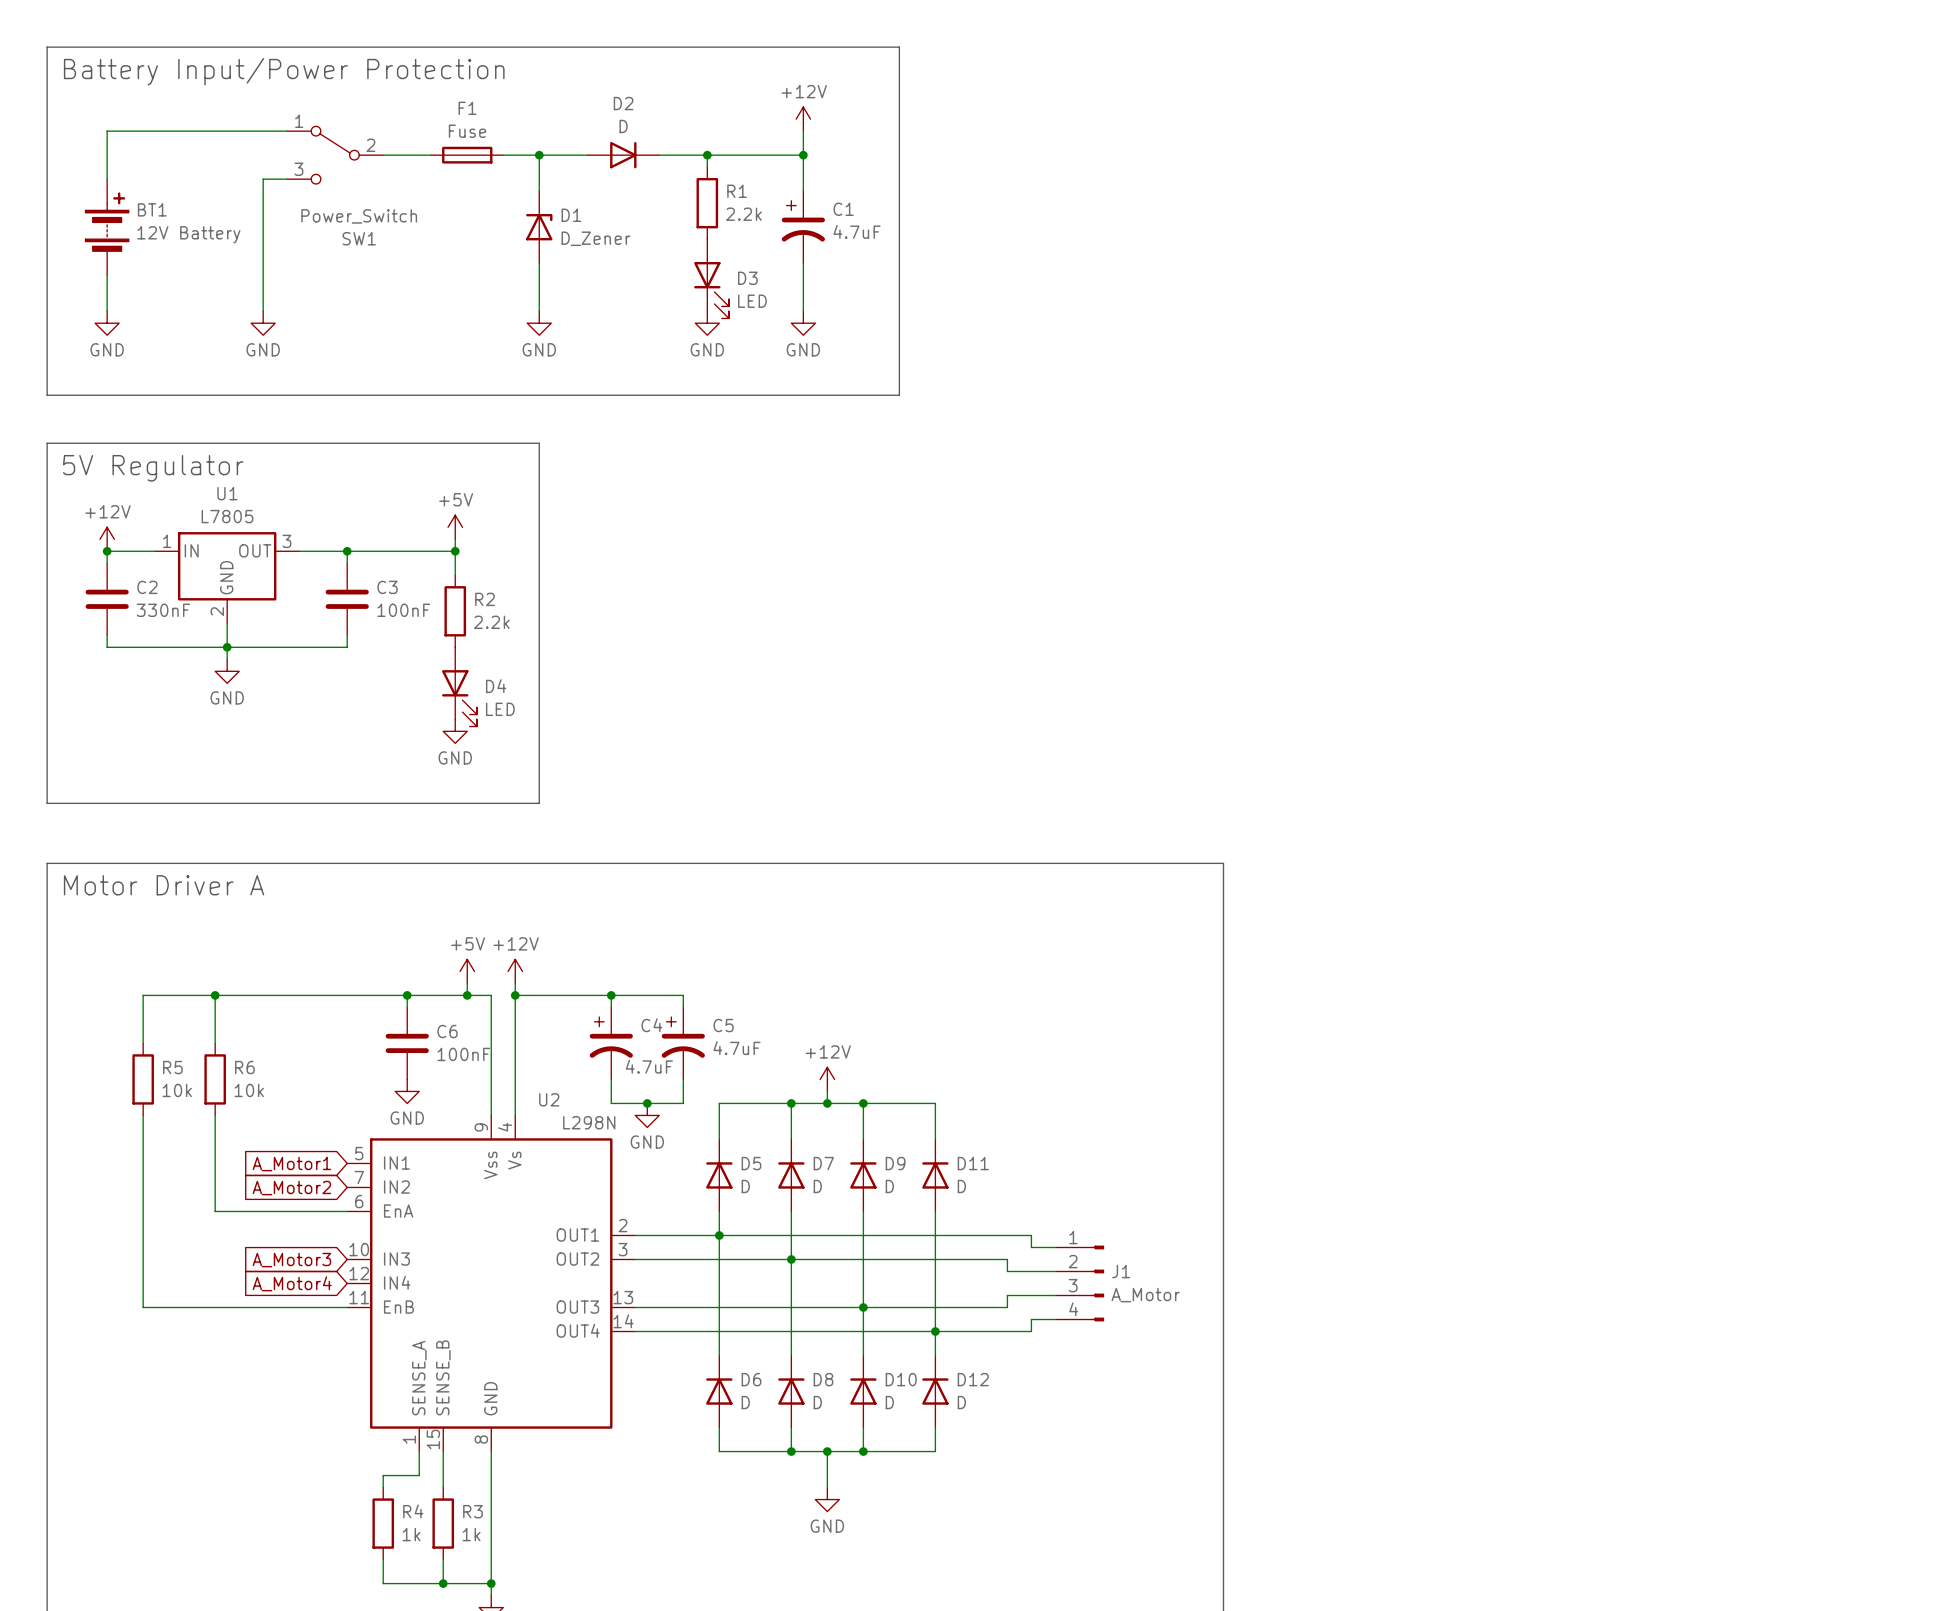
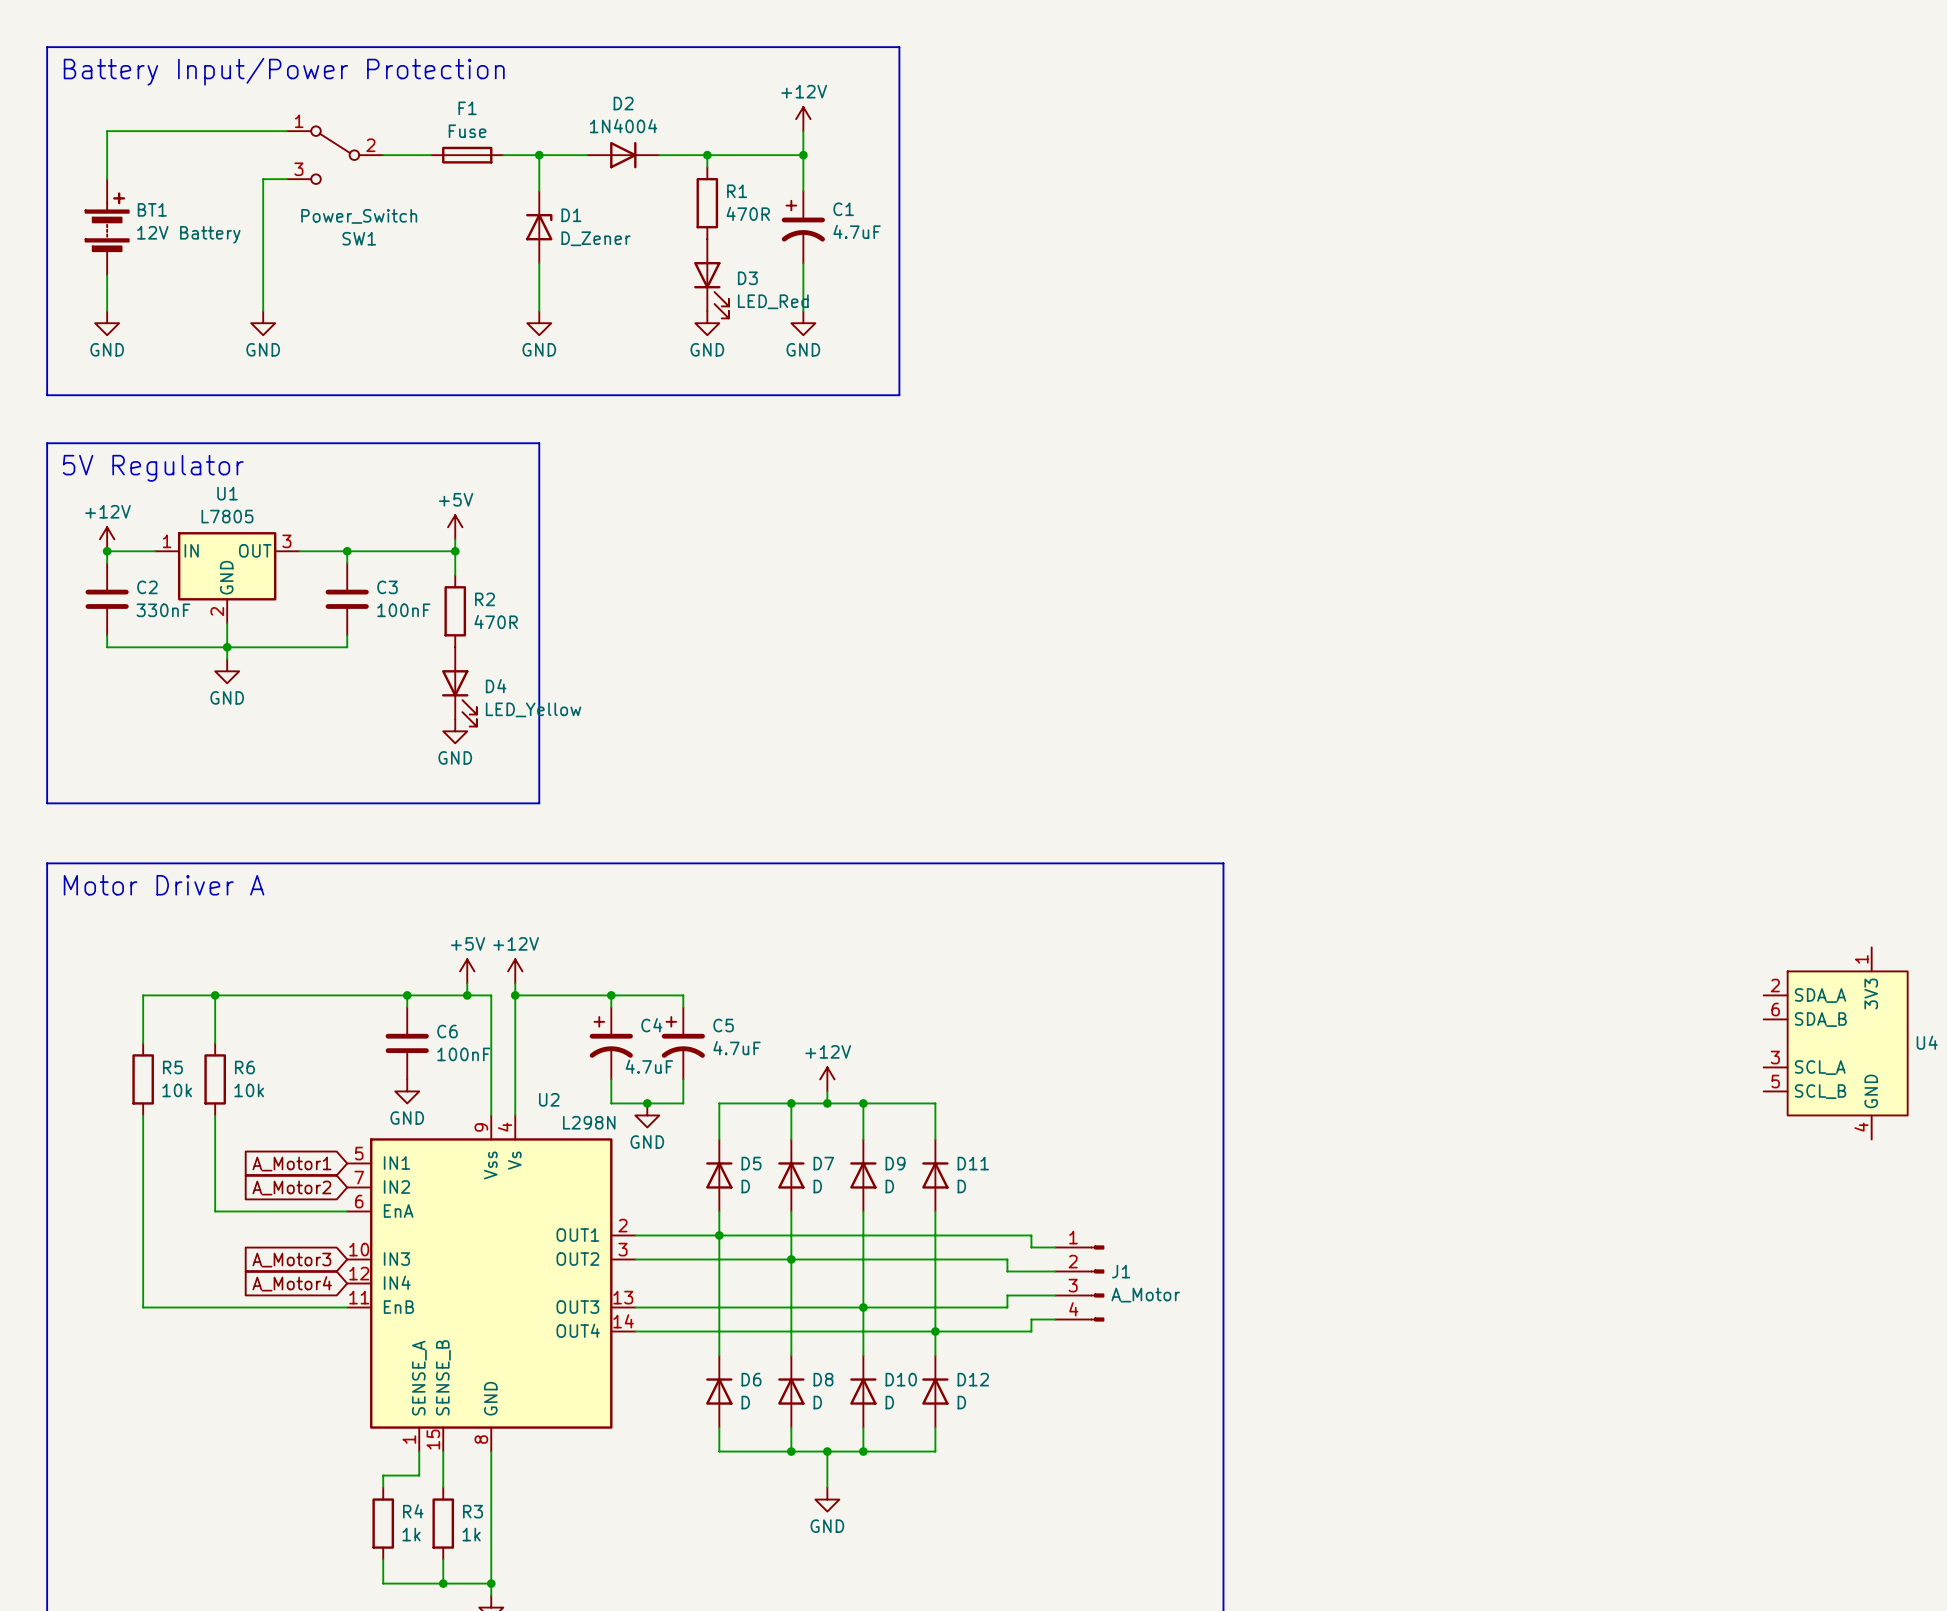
D2 value: D (623, 126) -> 1N4004 (623, 126)
R1 value: 2.2k (743, 214) -> 470R (748, 213)
D3 value: LED (752, 301) -> LED_Red (773, 301)
R2 value: 2.2k (491, 622) -> 470R (496, 622)
D4 value: LED (500, 709) -> LED_Yellow (533, 709)
U4: none -> (1835, 1043)

